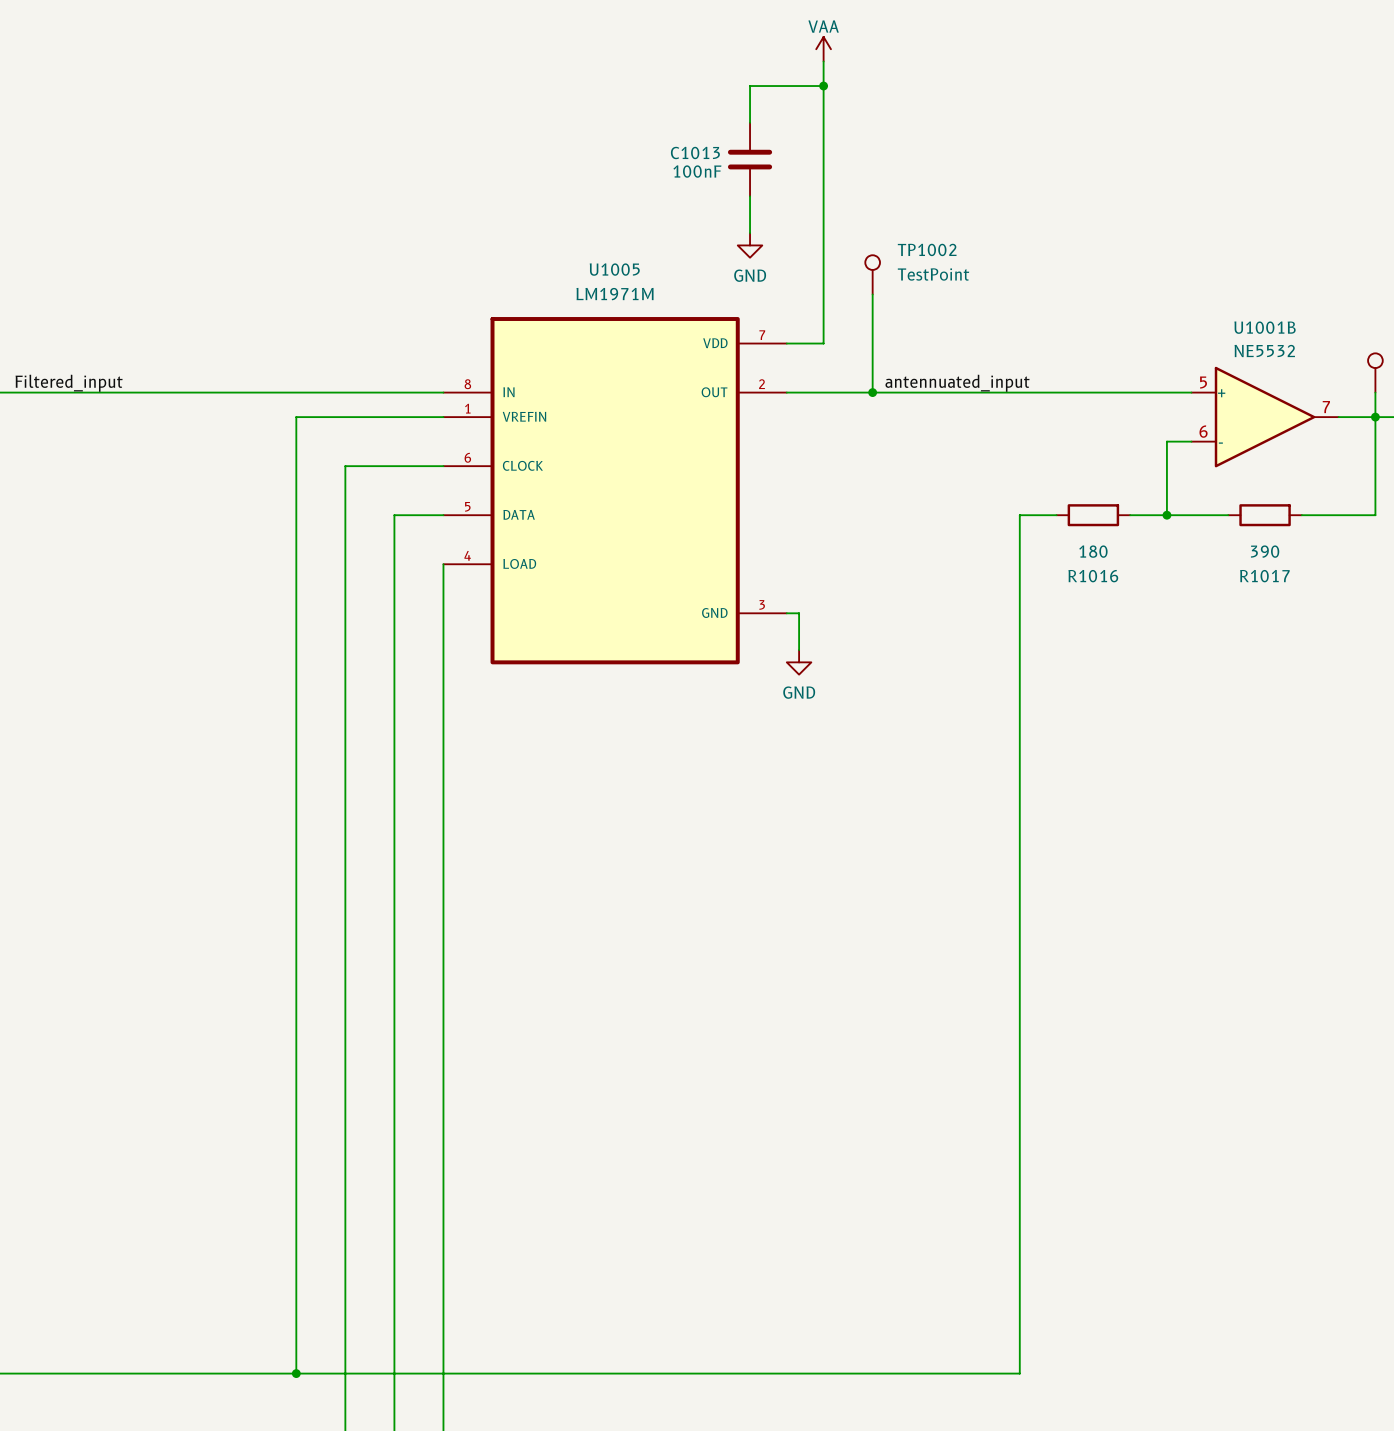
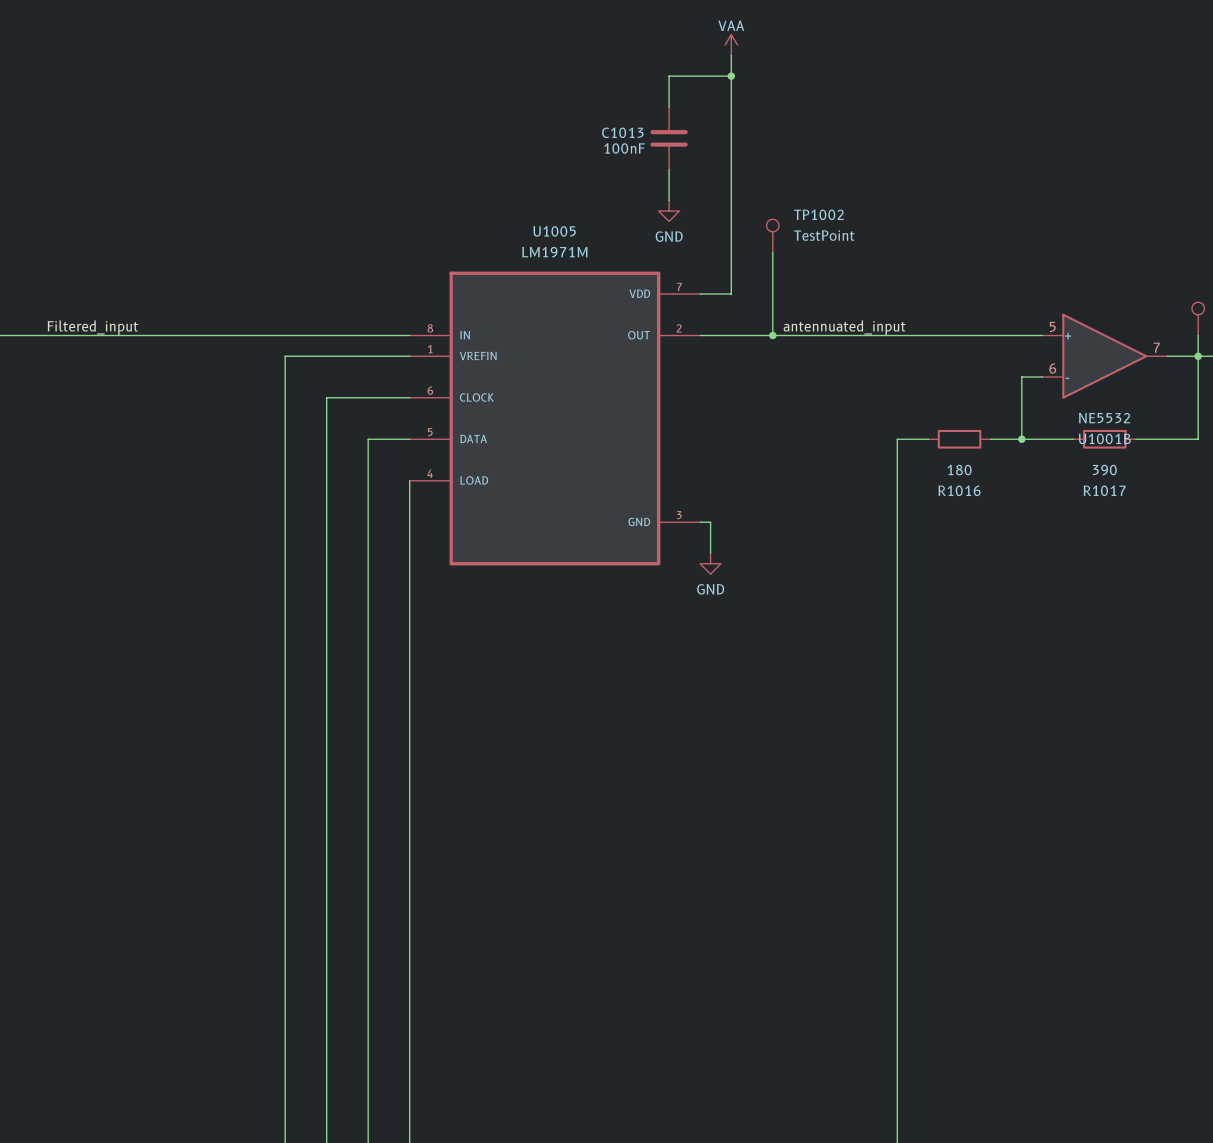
U1001B name position: U1001B (1265, 327) -> U1001B (1104, 438)
U1001B value position: NE5532 (1264, 350) -> NE5532 (1104, 418)

